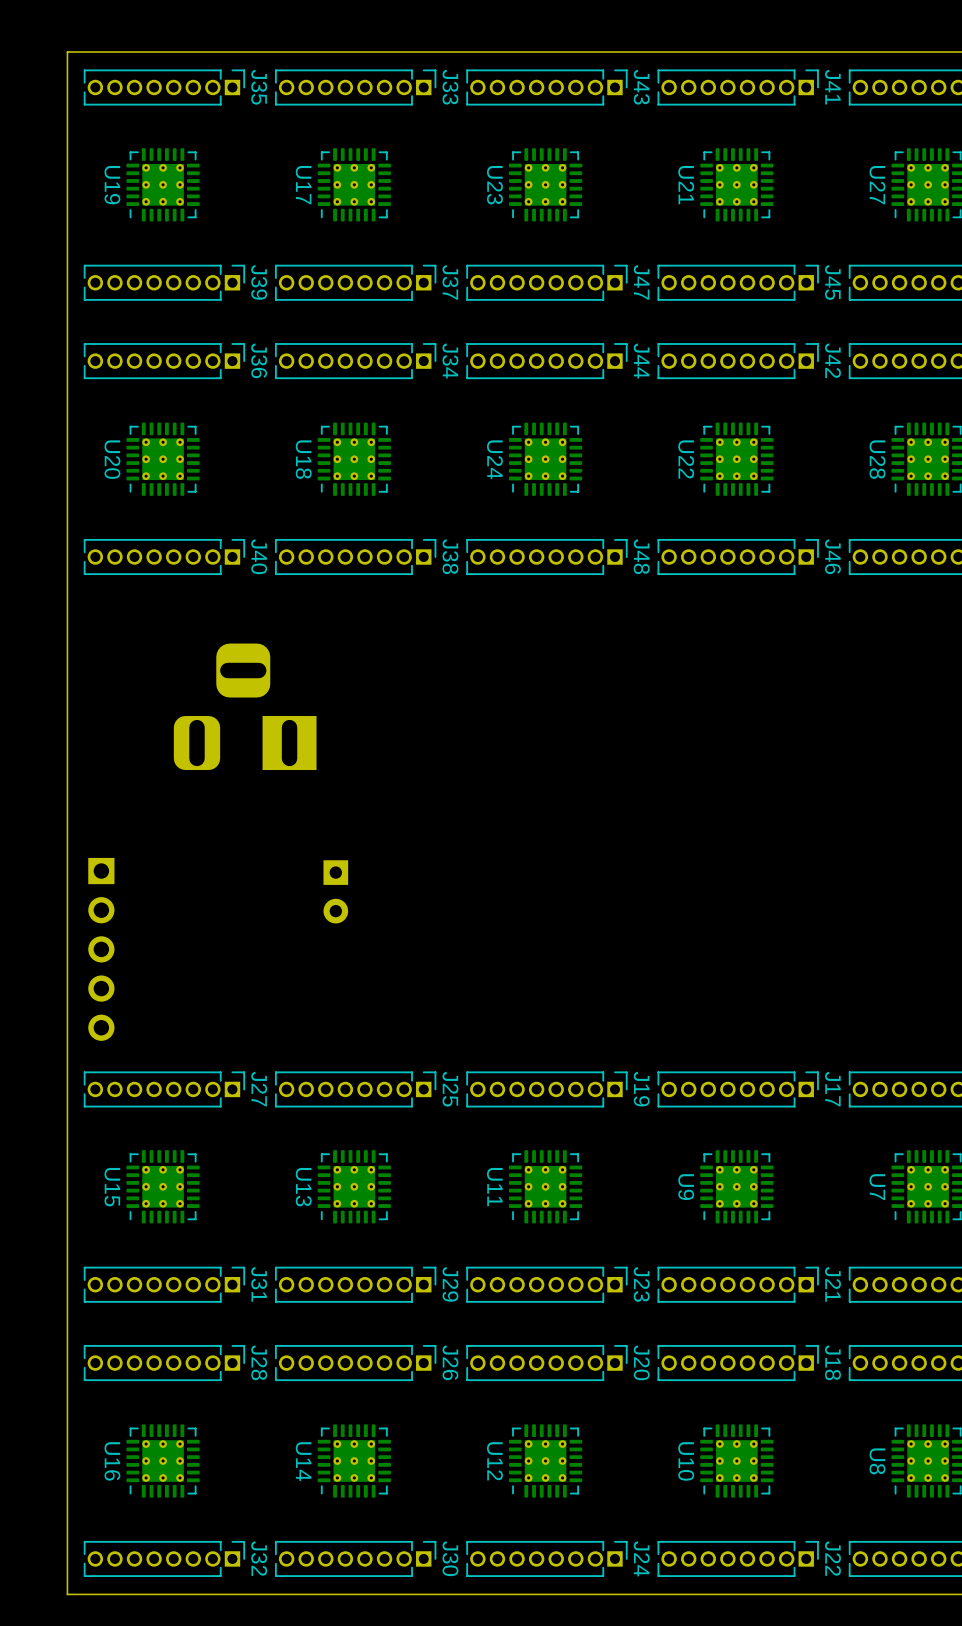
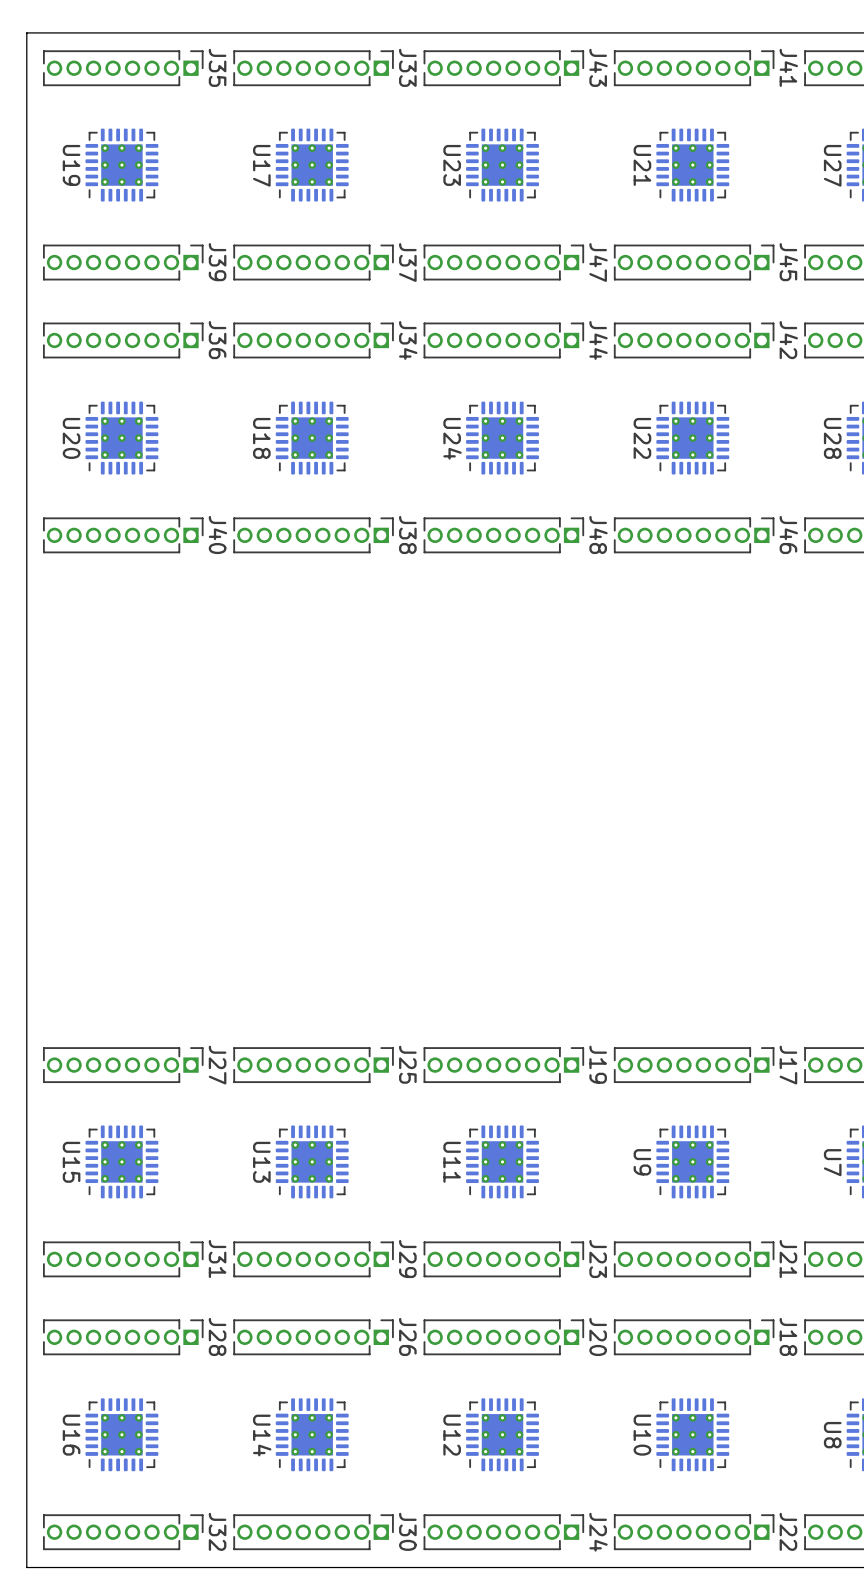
part: (245, 706) -> none
part: (335, 891) -> none
part: (101, 949) -> none

